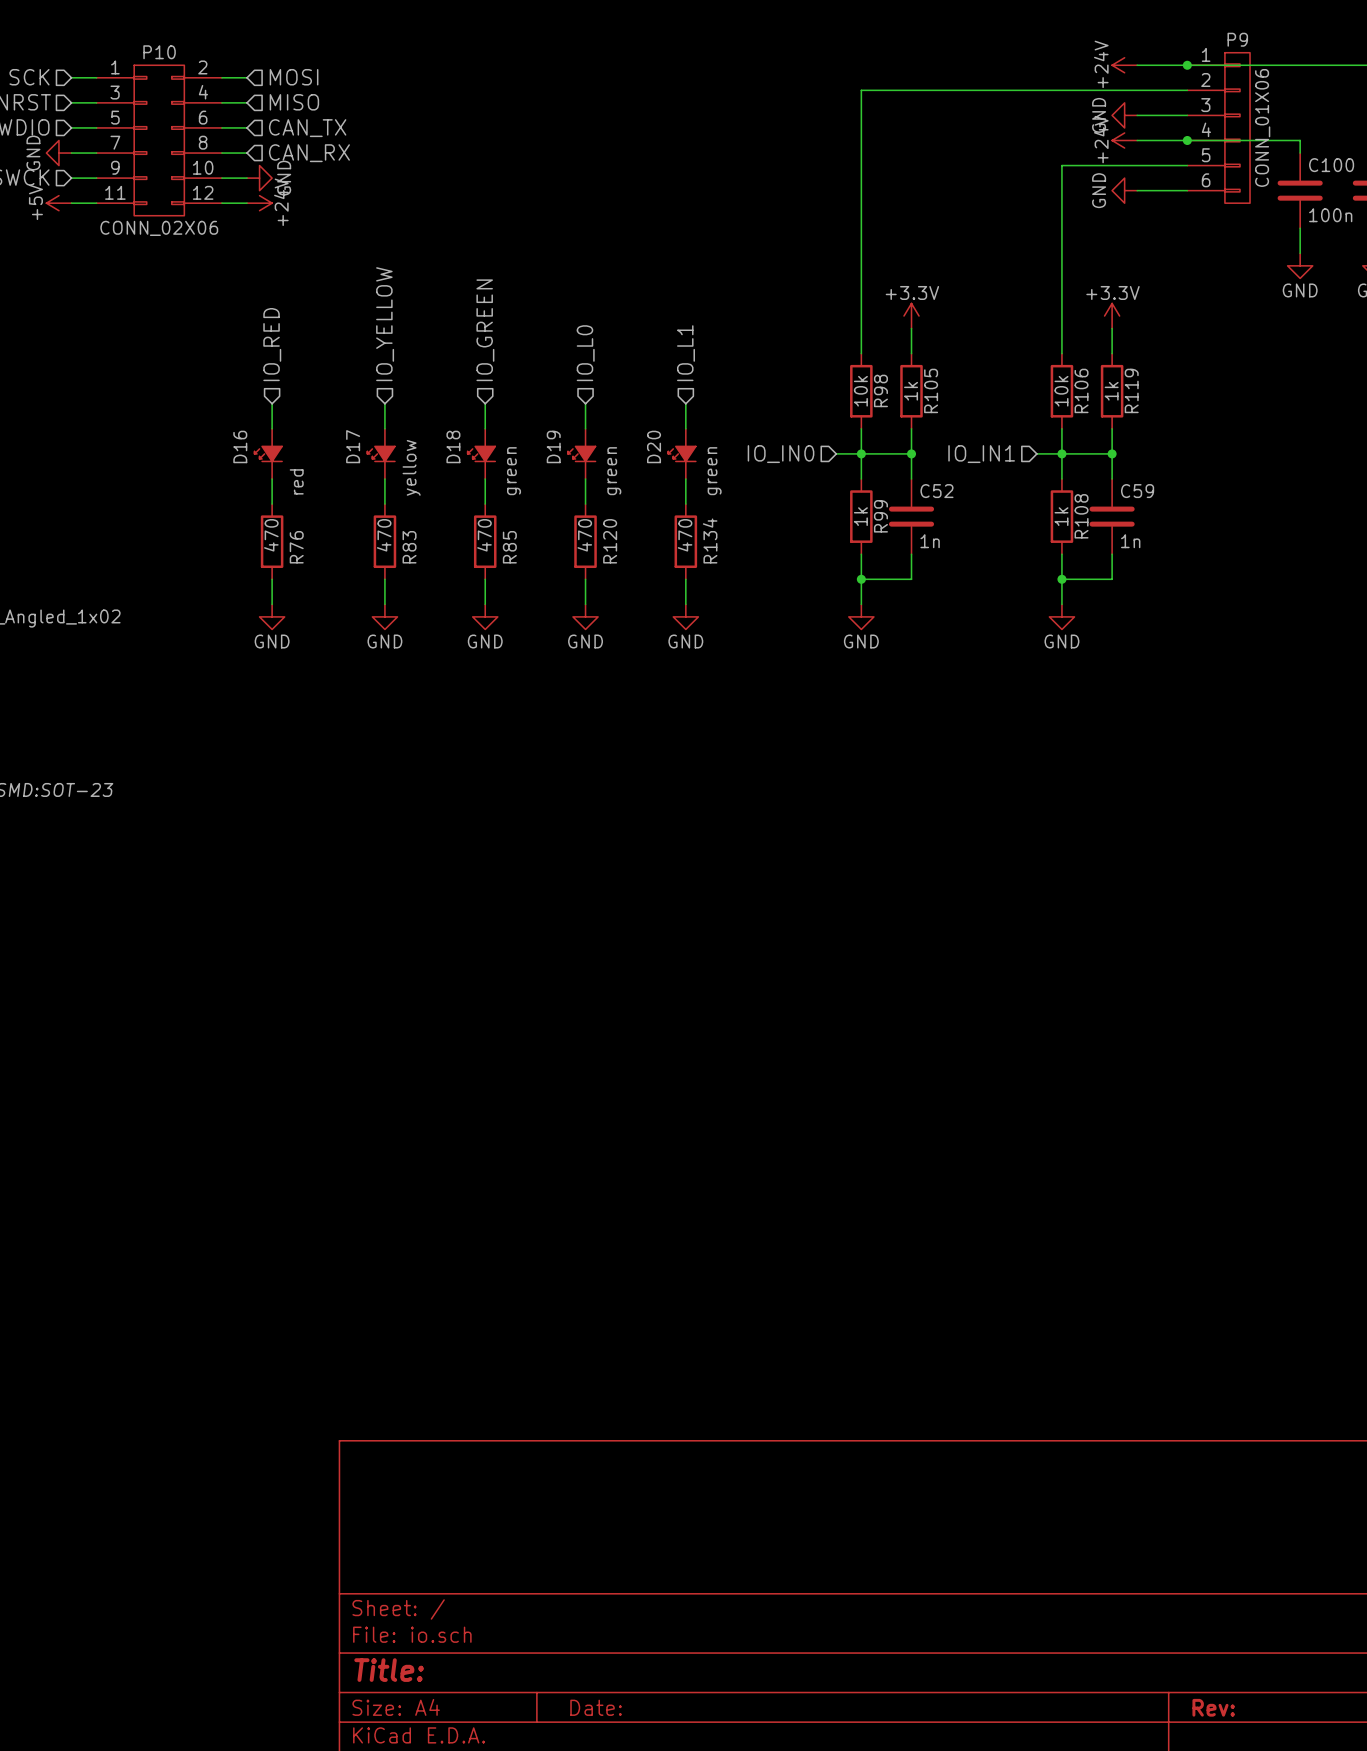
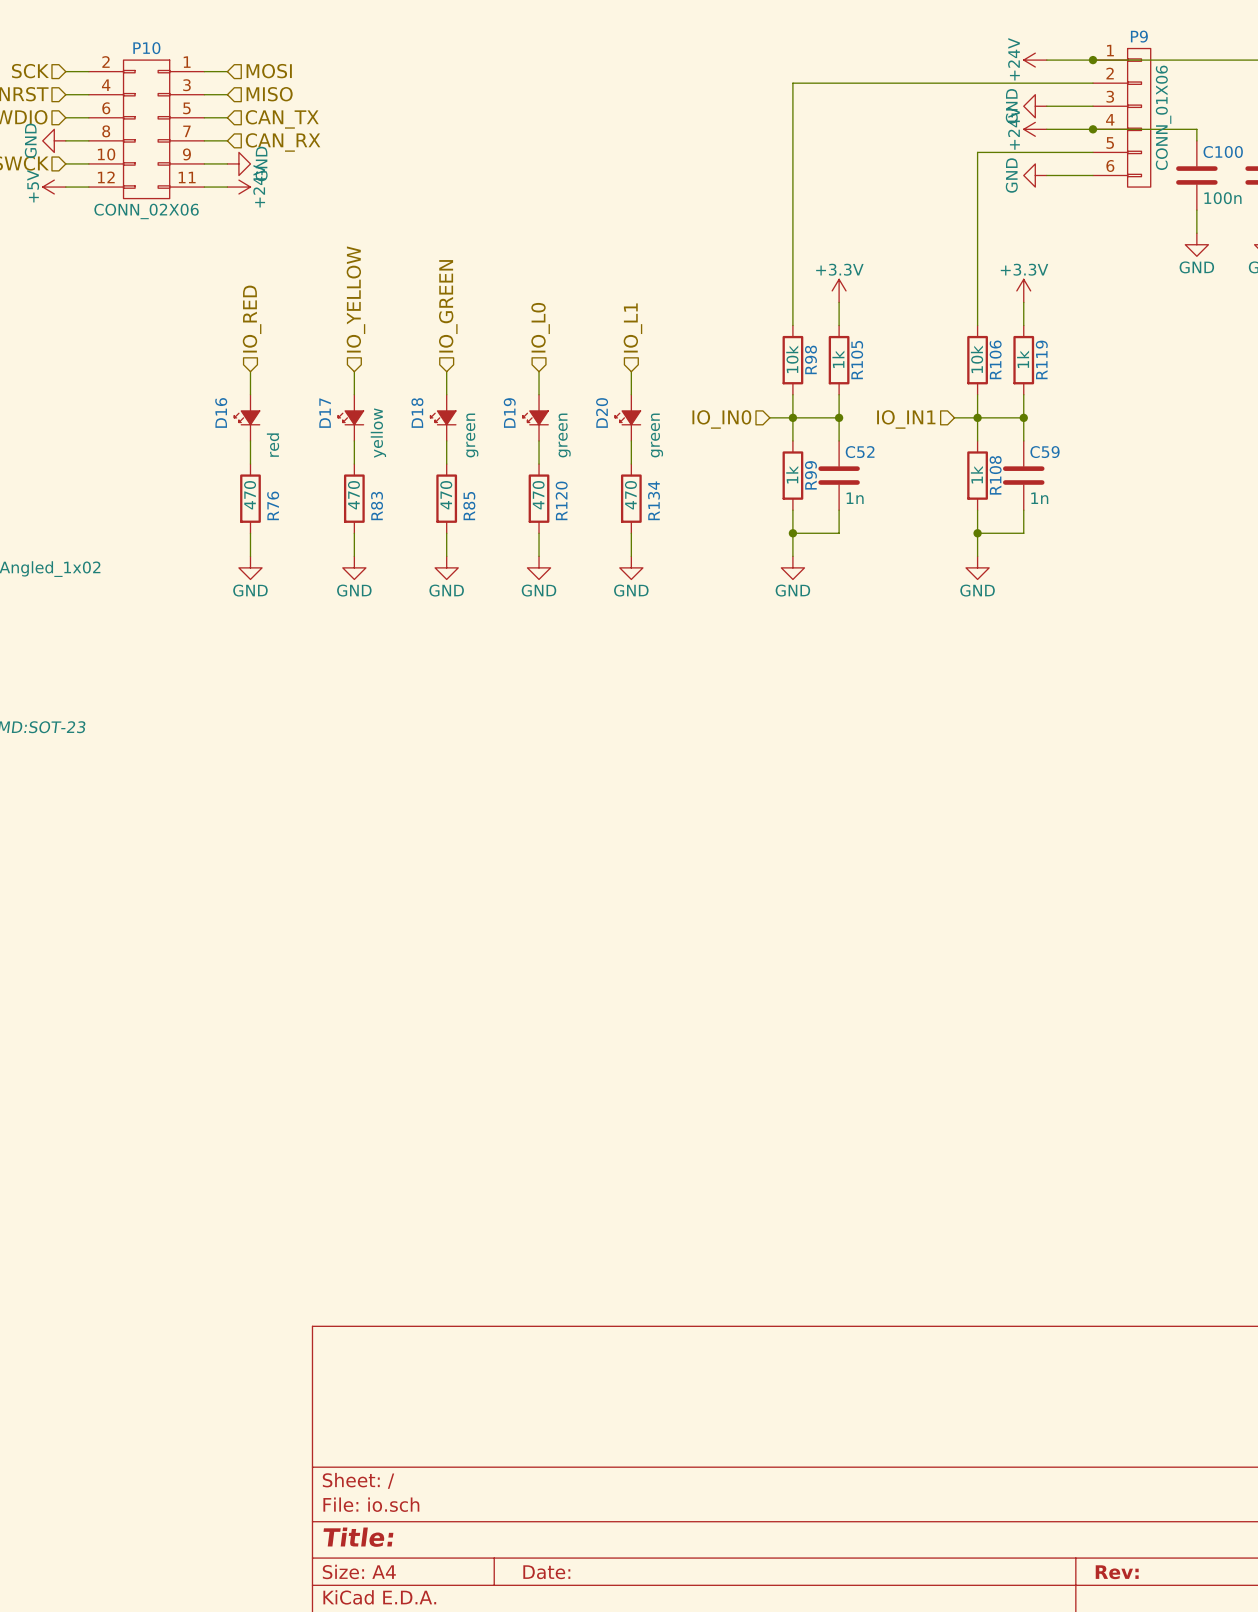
P10 flip: as is (159, 140) -> left-right (146, 129)

